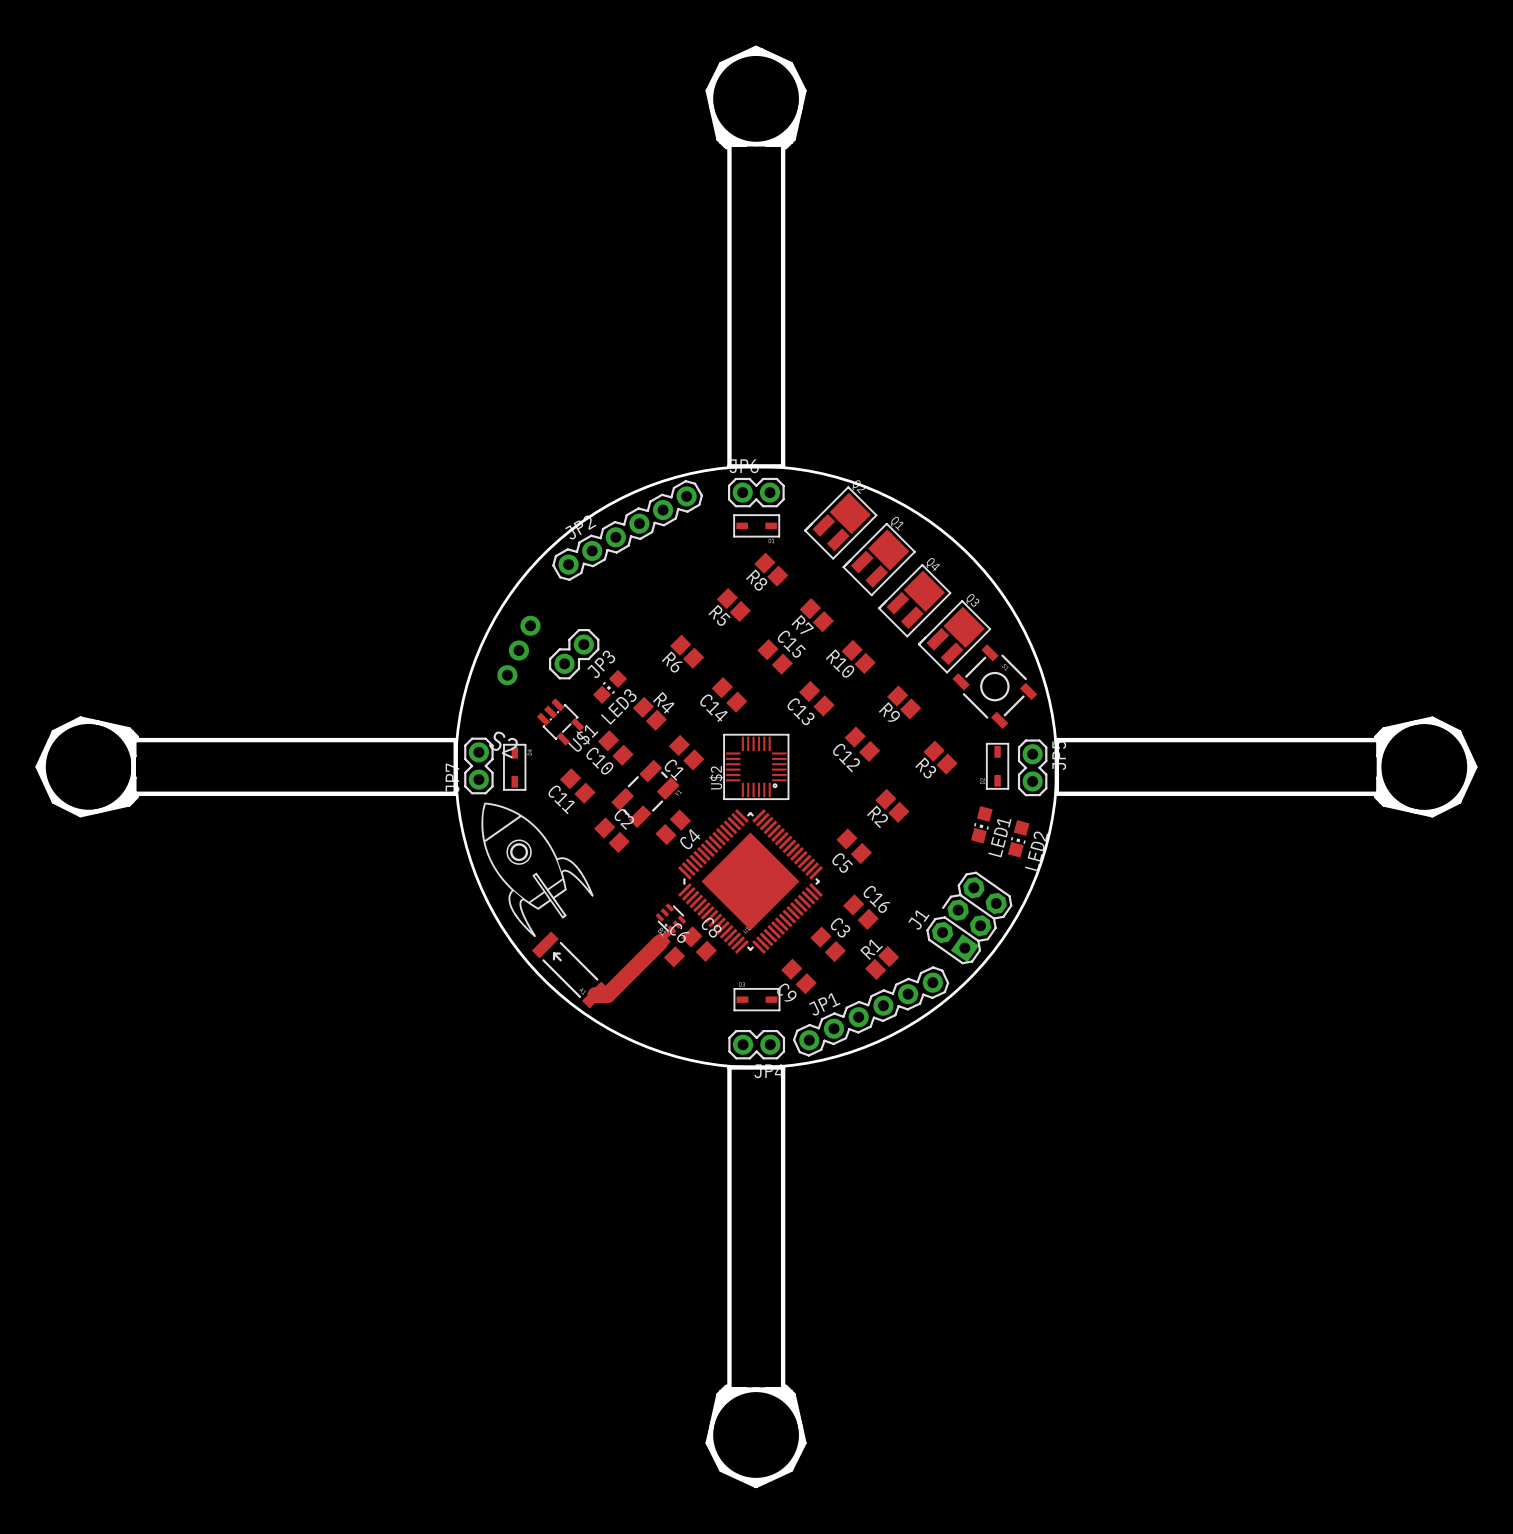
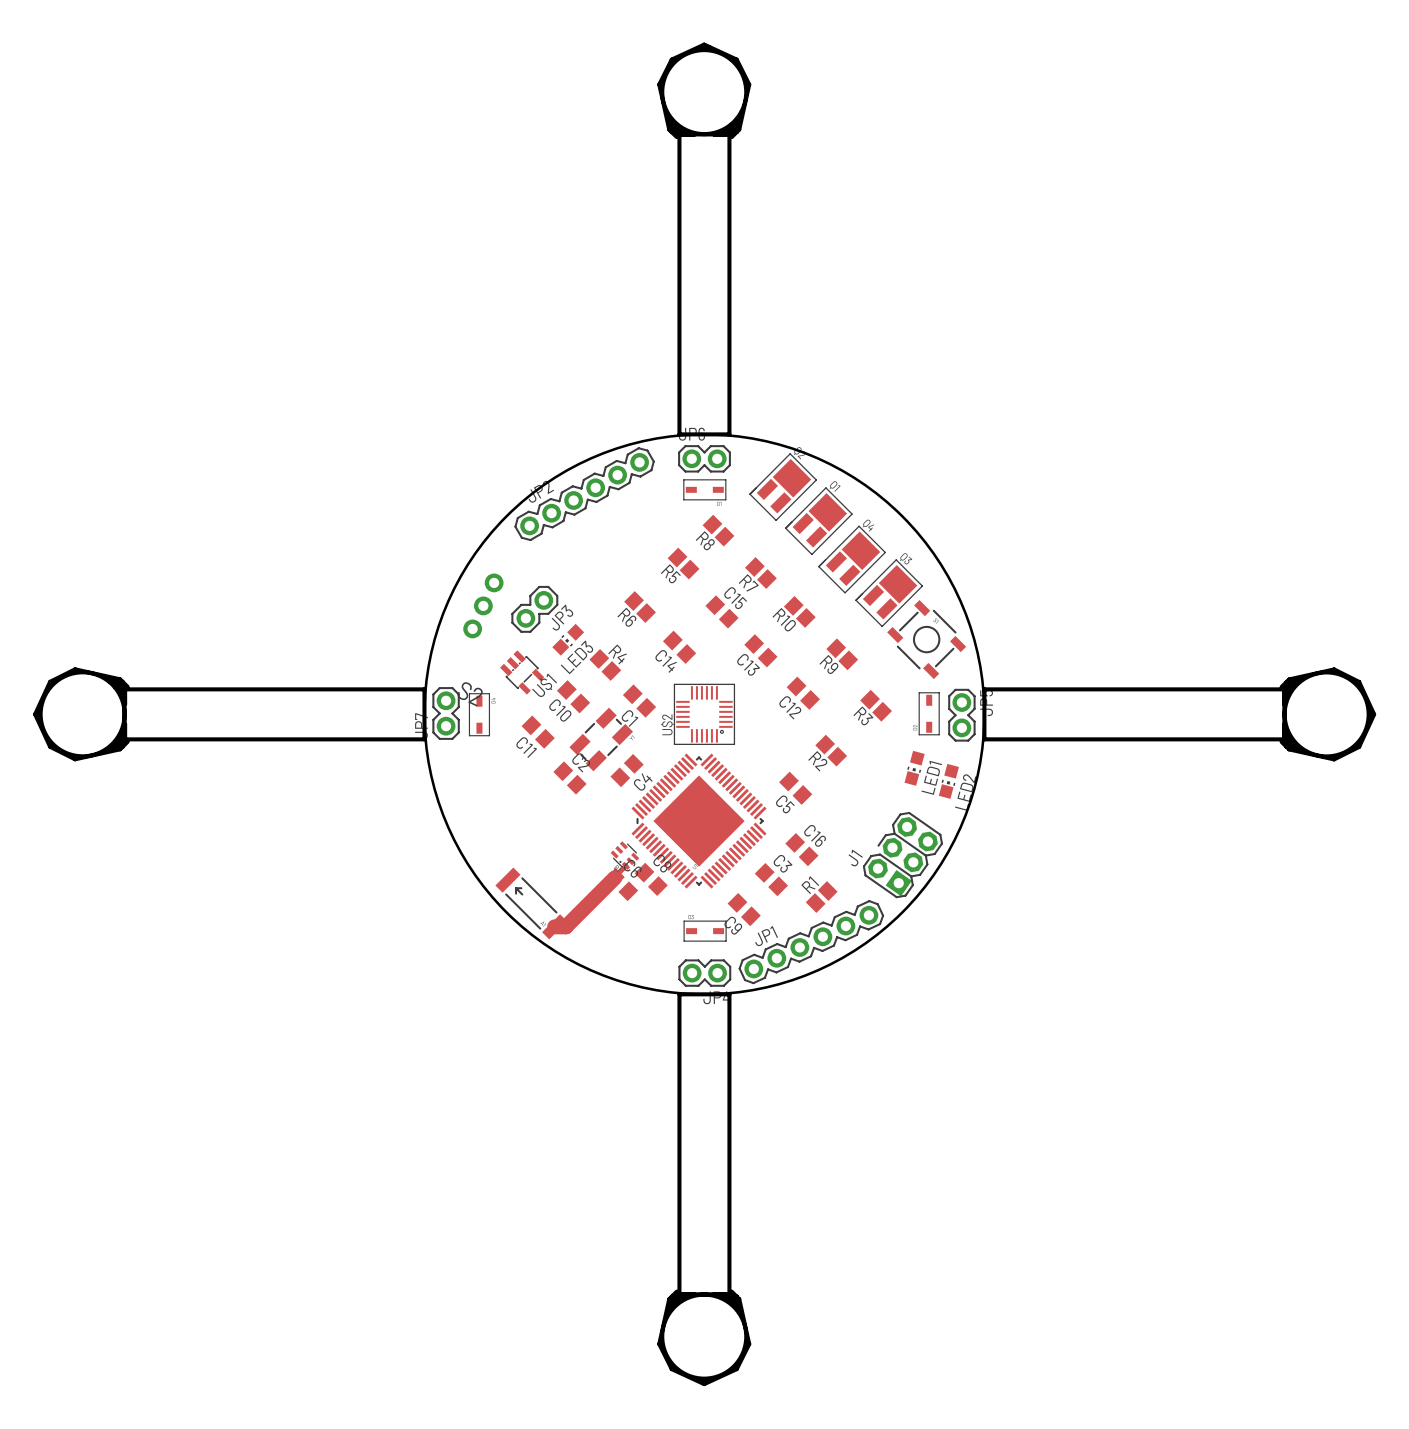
drawing: [481, 802, 594, 938] -> none

